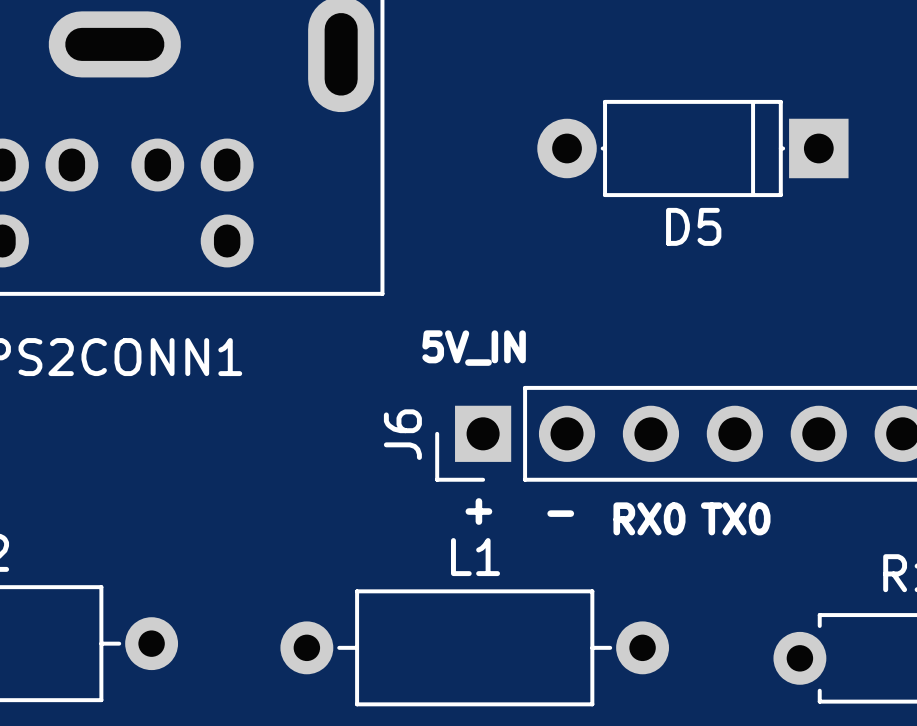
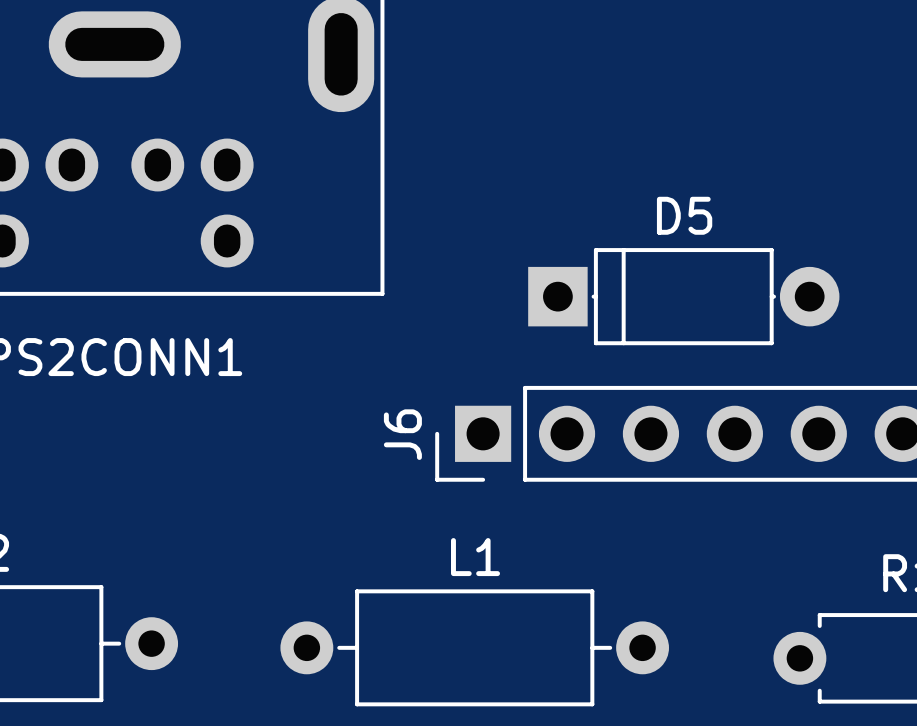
D5 rotation: 0° (692, 148) -> 180° (683, 296)
text: 5V_IN (474, 348) -> none
text: + (478, 511) -> none
text: - (560, 513) -> none
text: RX0 (649, 518) -> none
text: TX0 (735, 518) -> none

